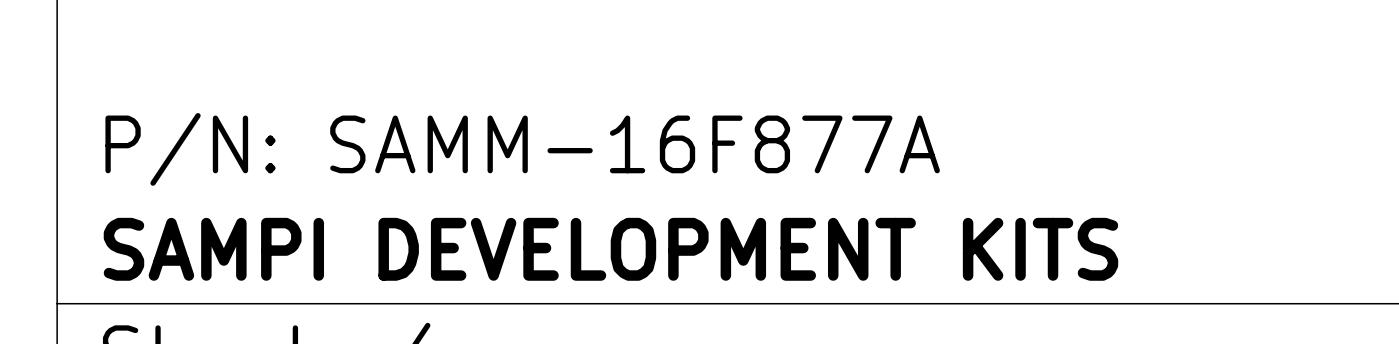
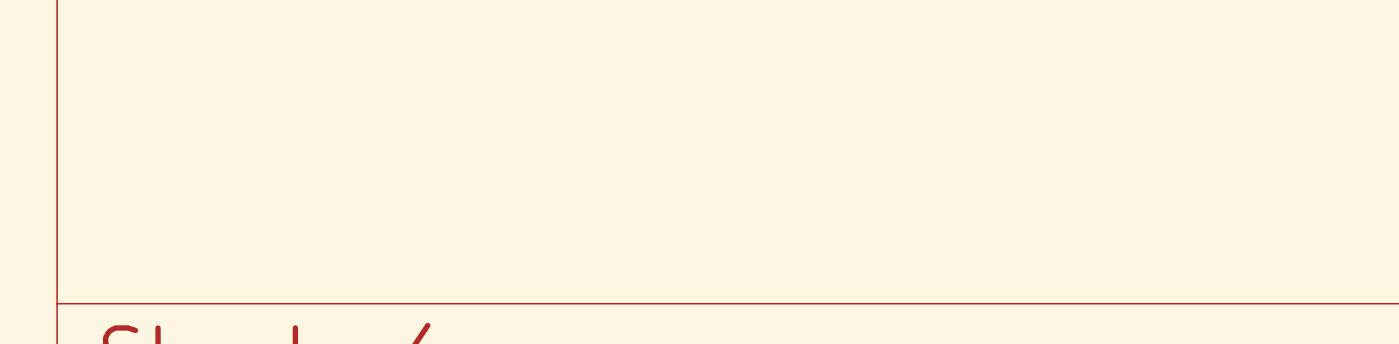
title block: P/N: SAMM-16F877A (522, 149) -> none
title block: SAMPI DEVELOPMENT KITS (610, 249) -> none

